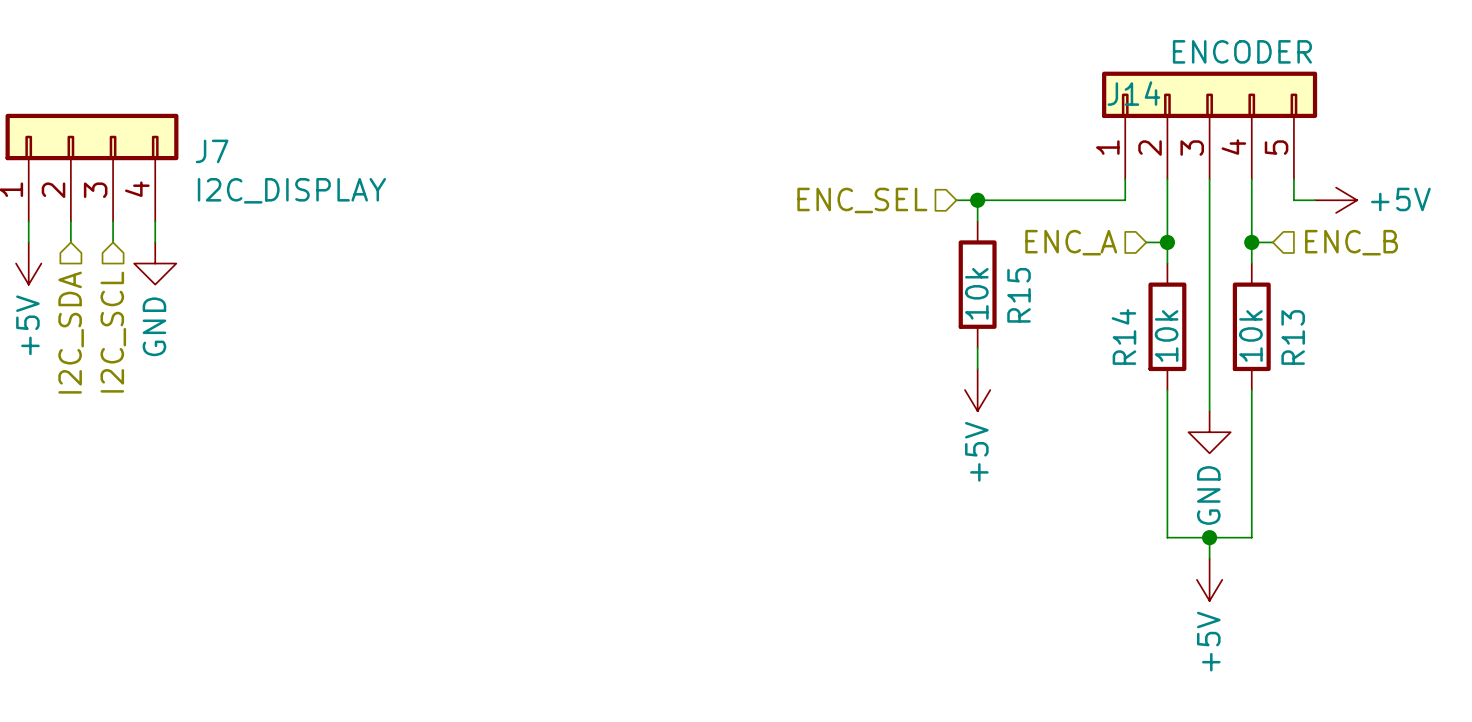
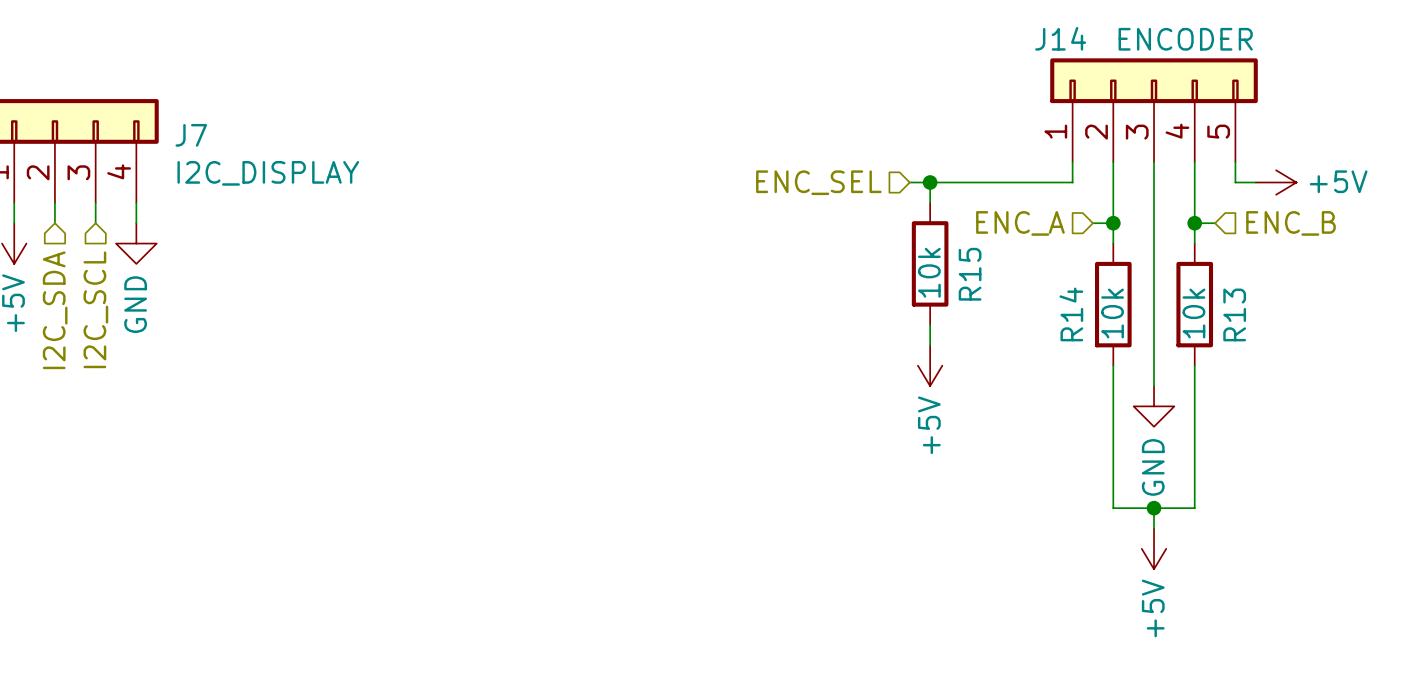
J14 name position: J14 (1133, 93) -> J14 (1060, 38)

